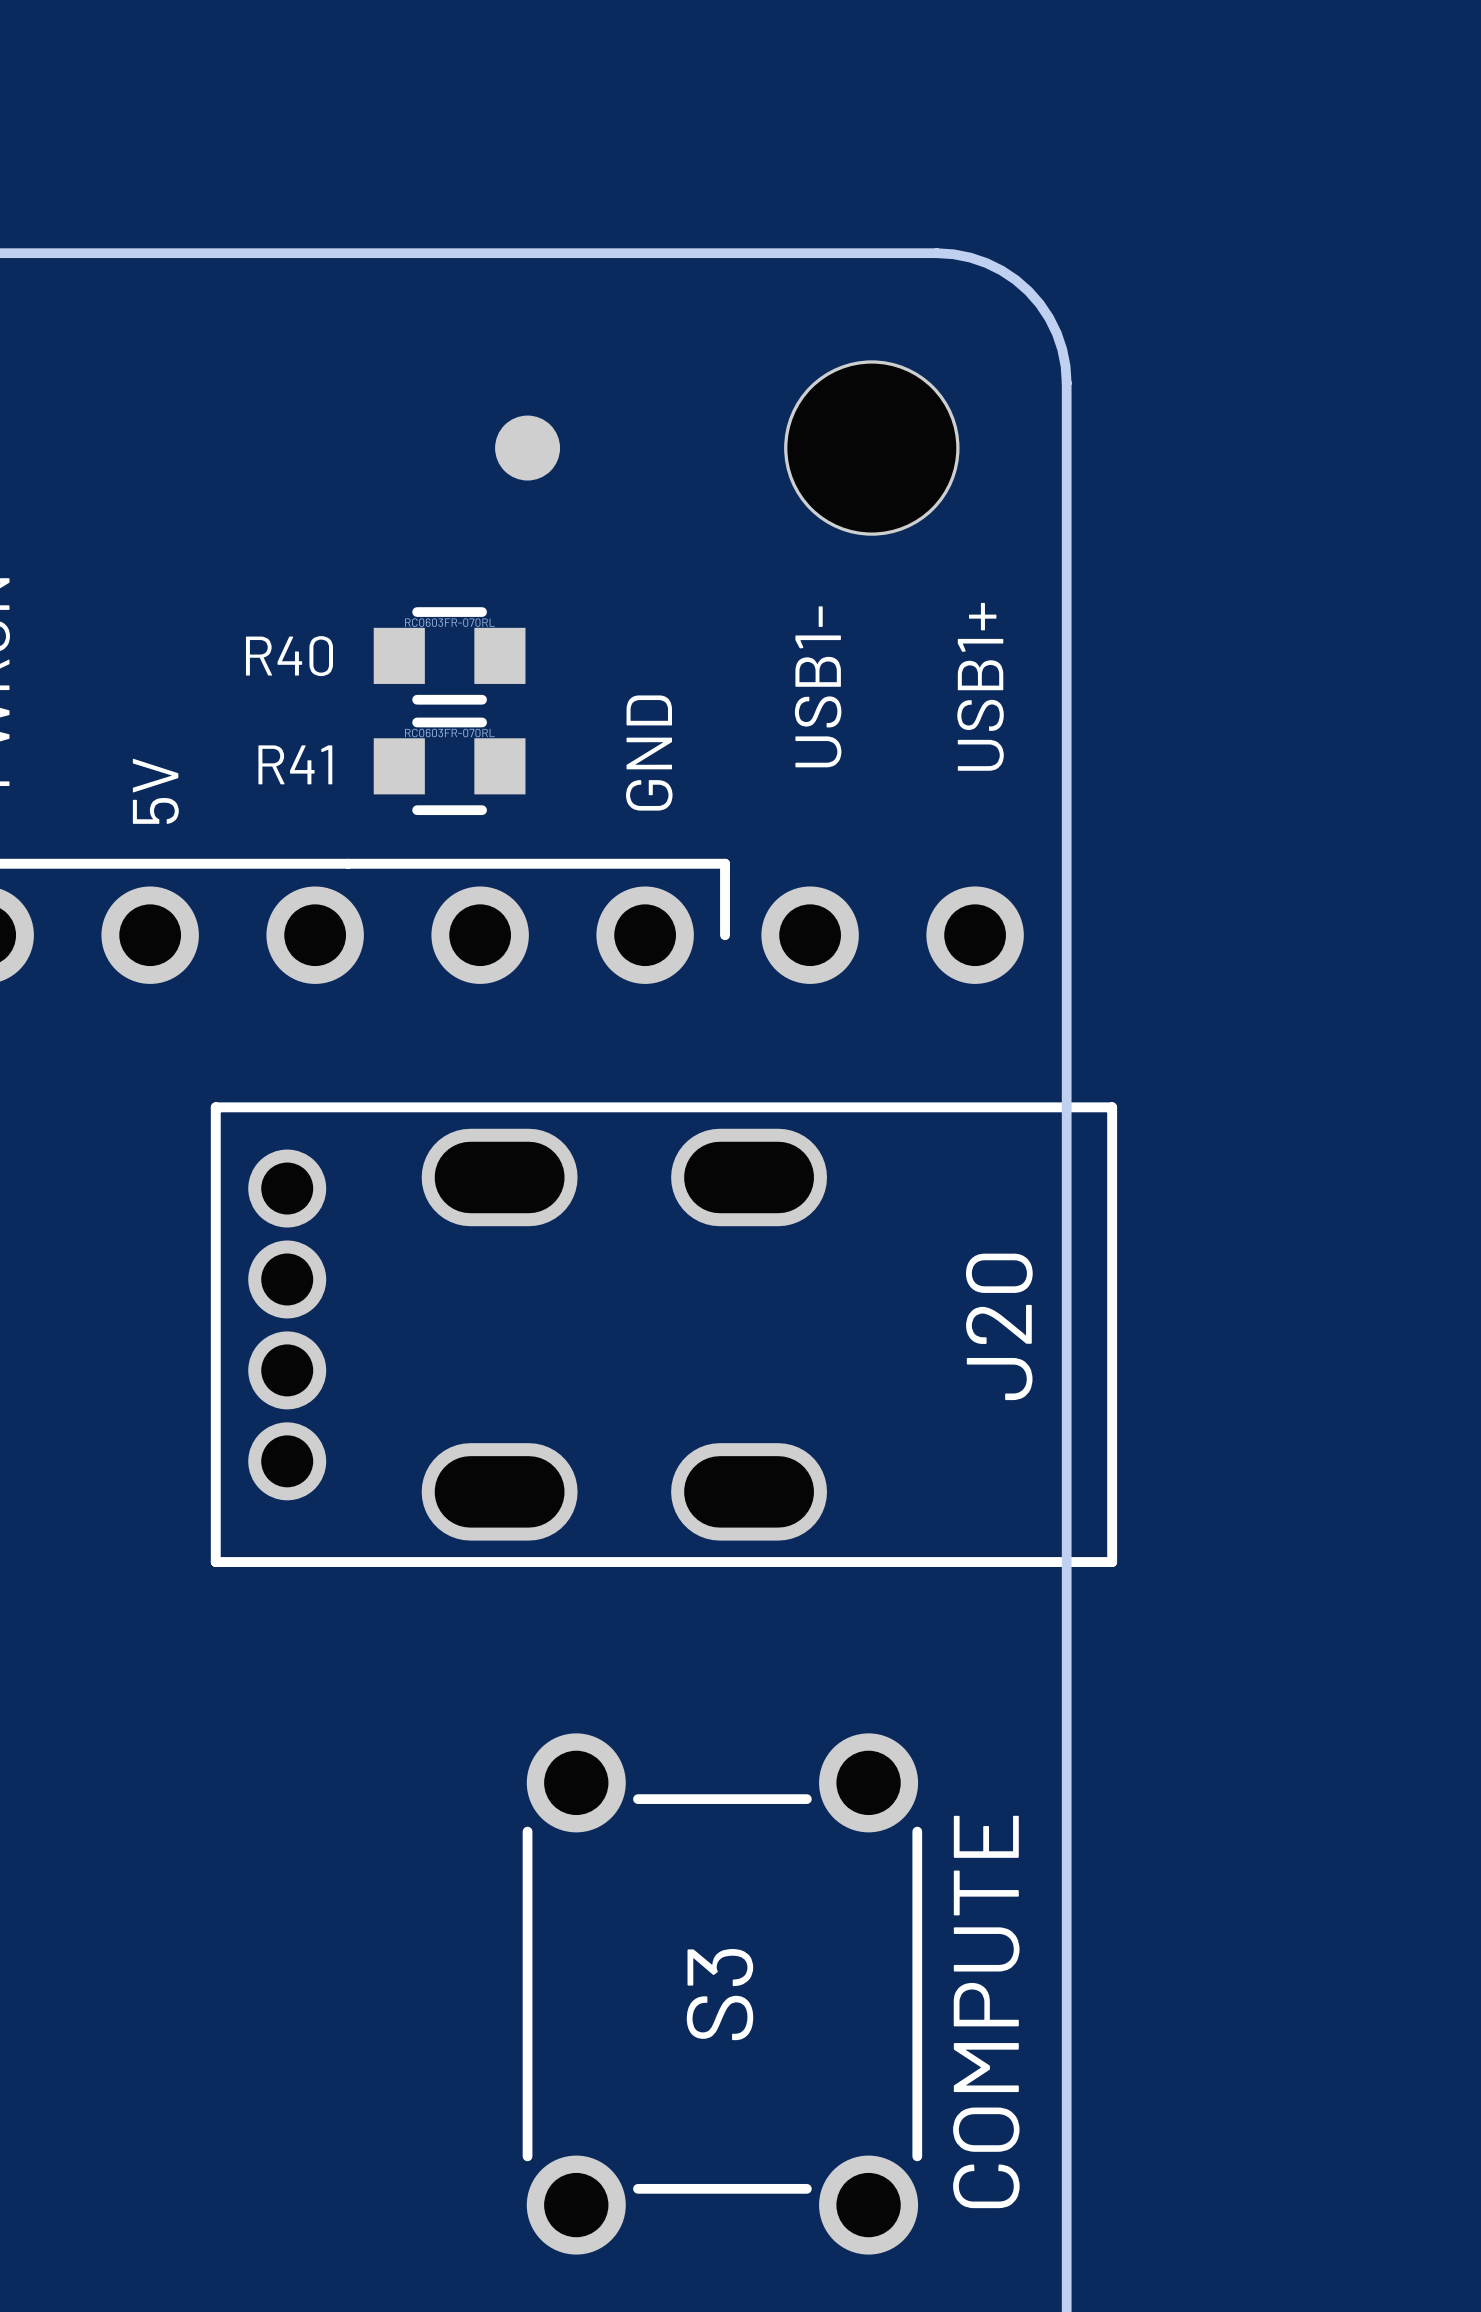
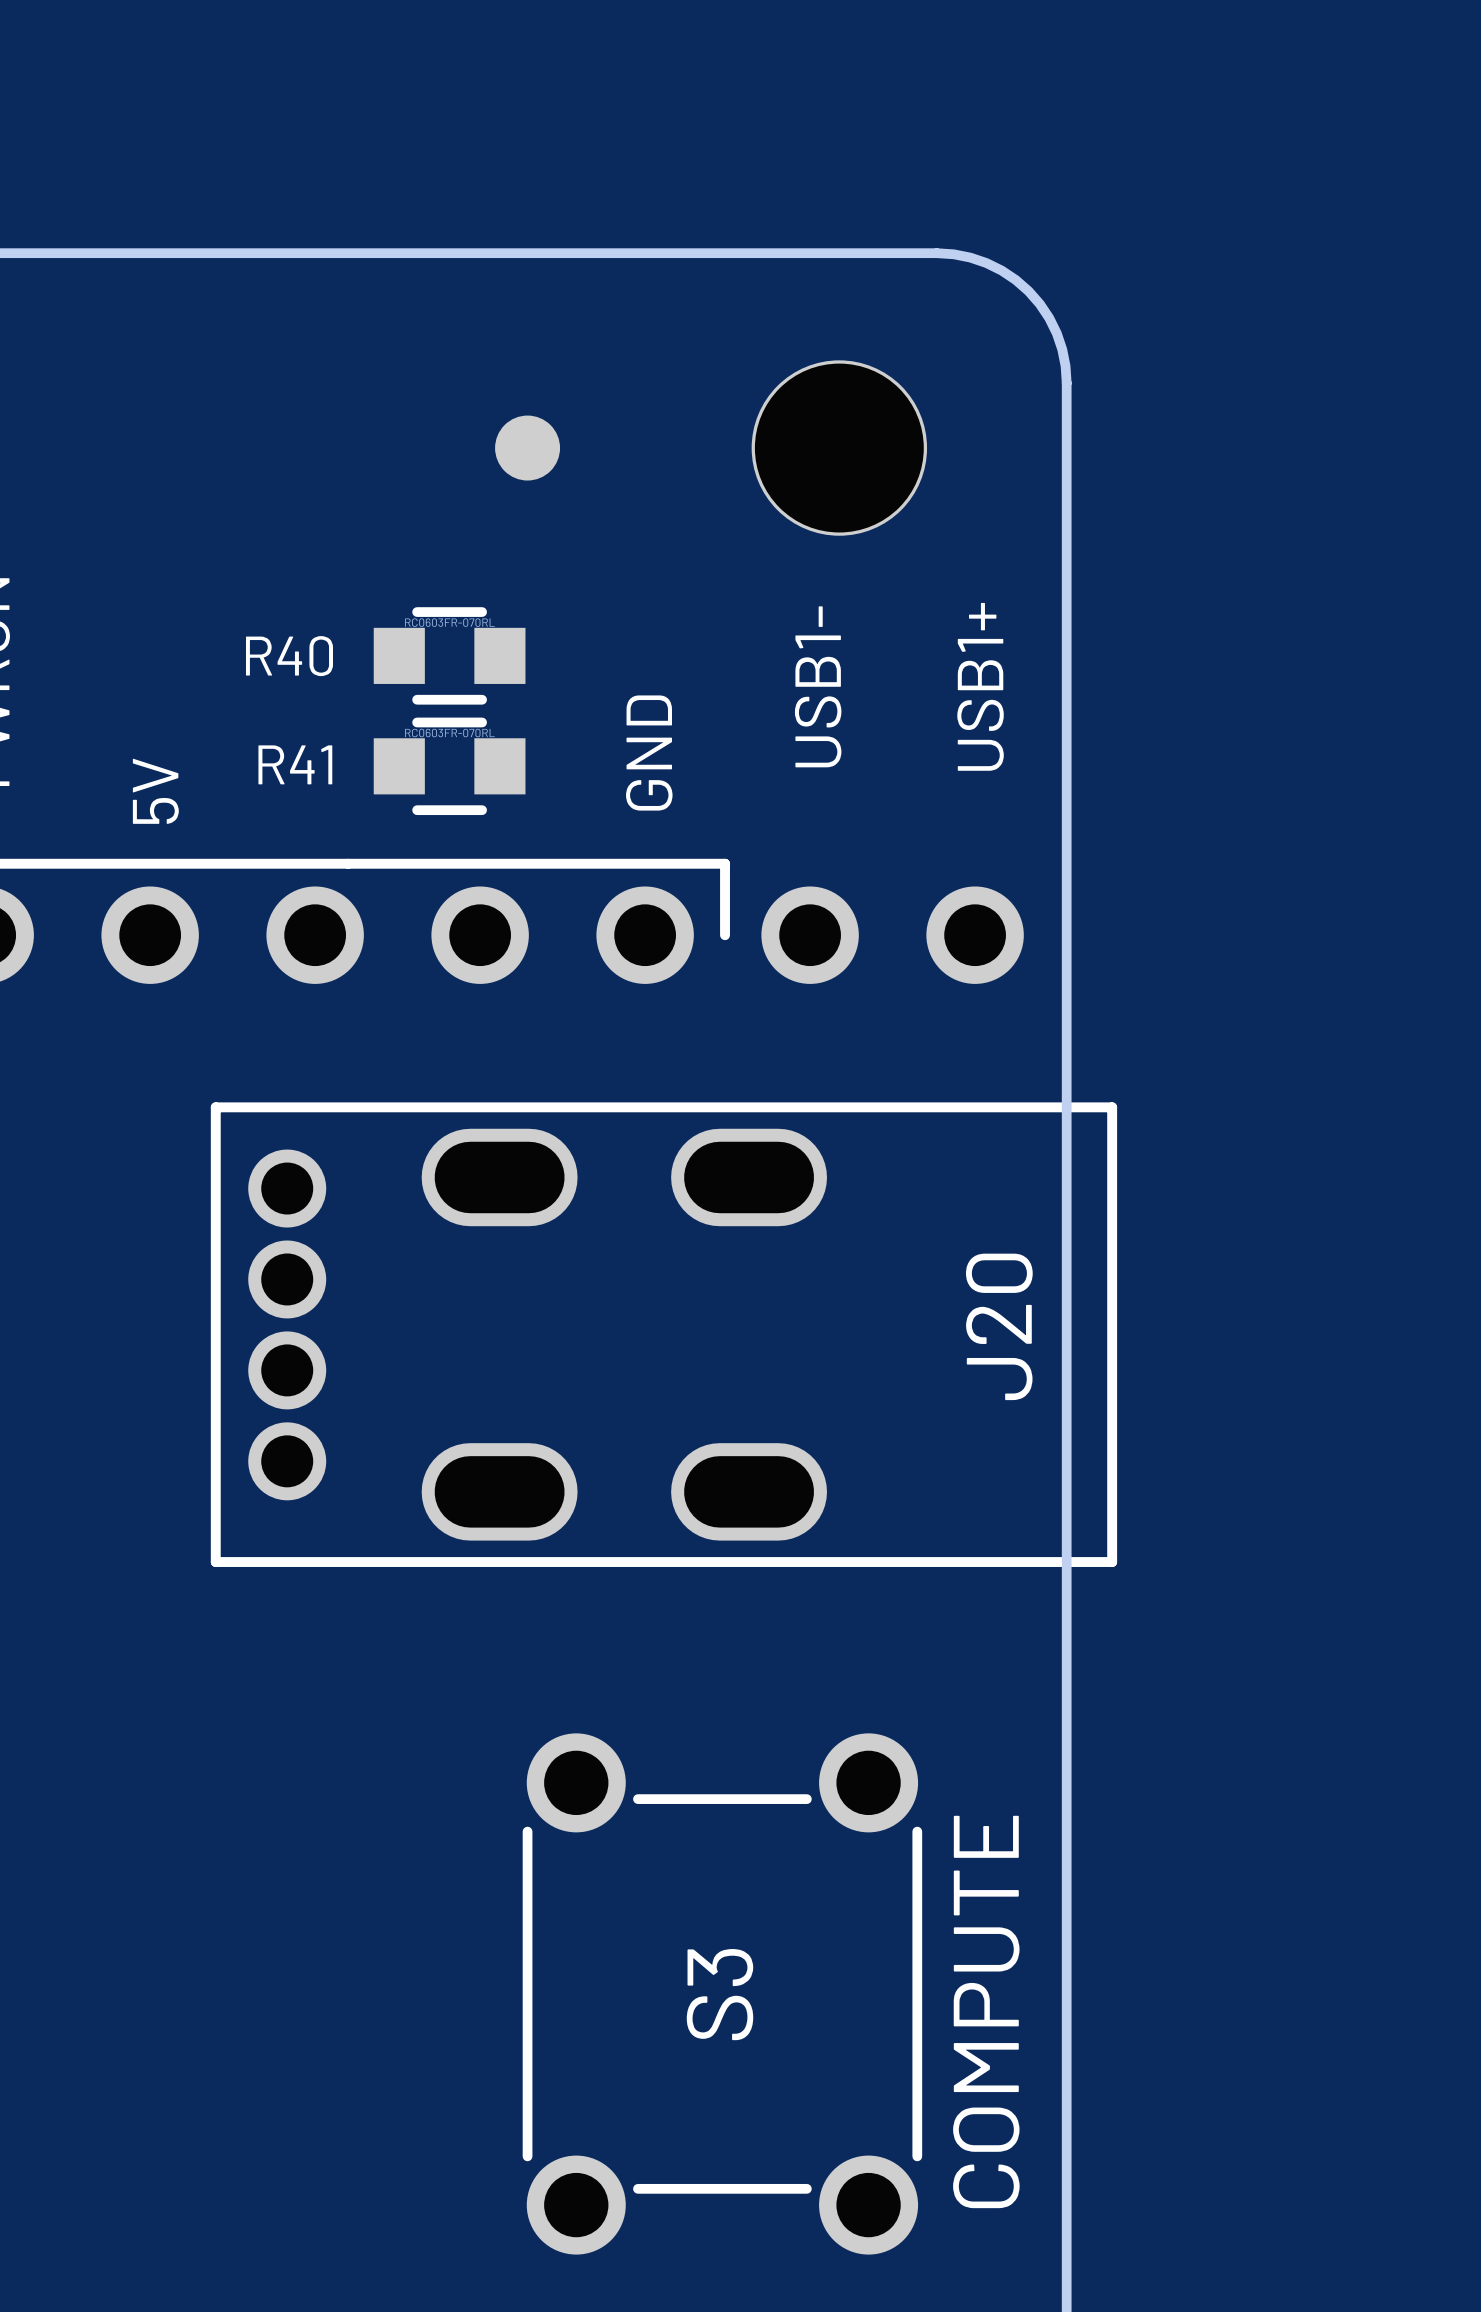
part position: (871, 448) -> (839, 448)

